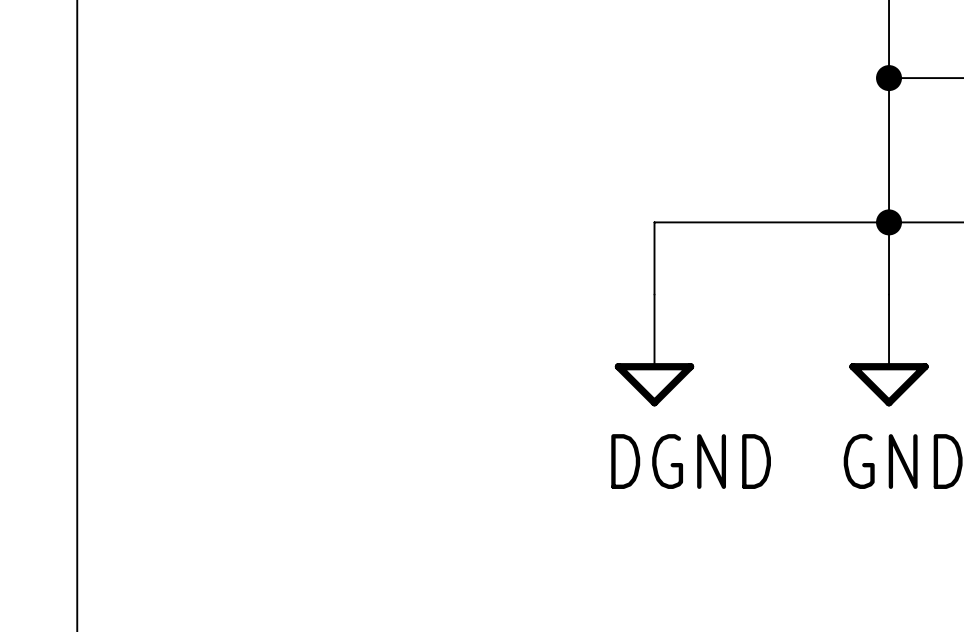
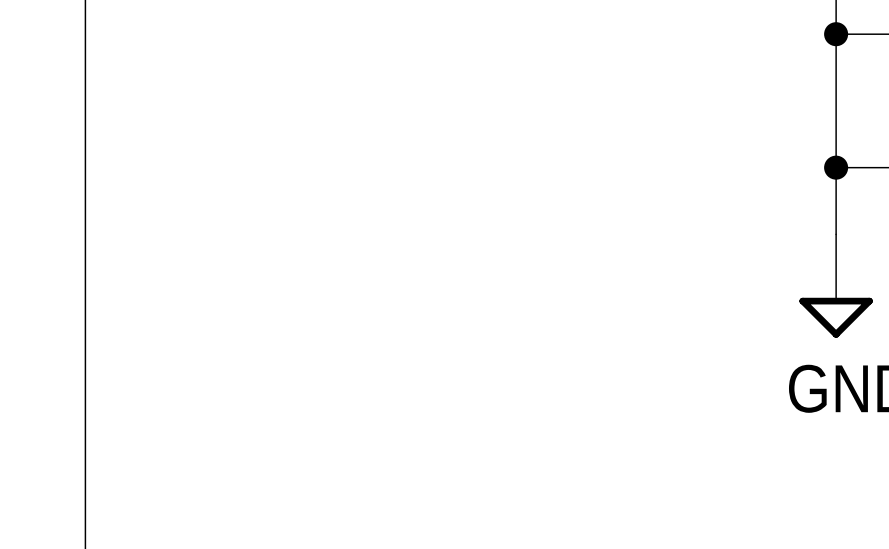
wire: (889, 222) (654, 222) (654, 294) -> none
power symbol: DGND (654, 350) -> none

